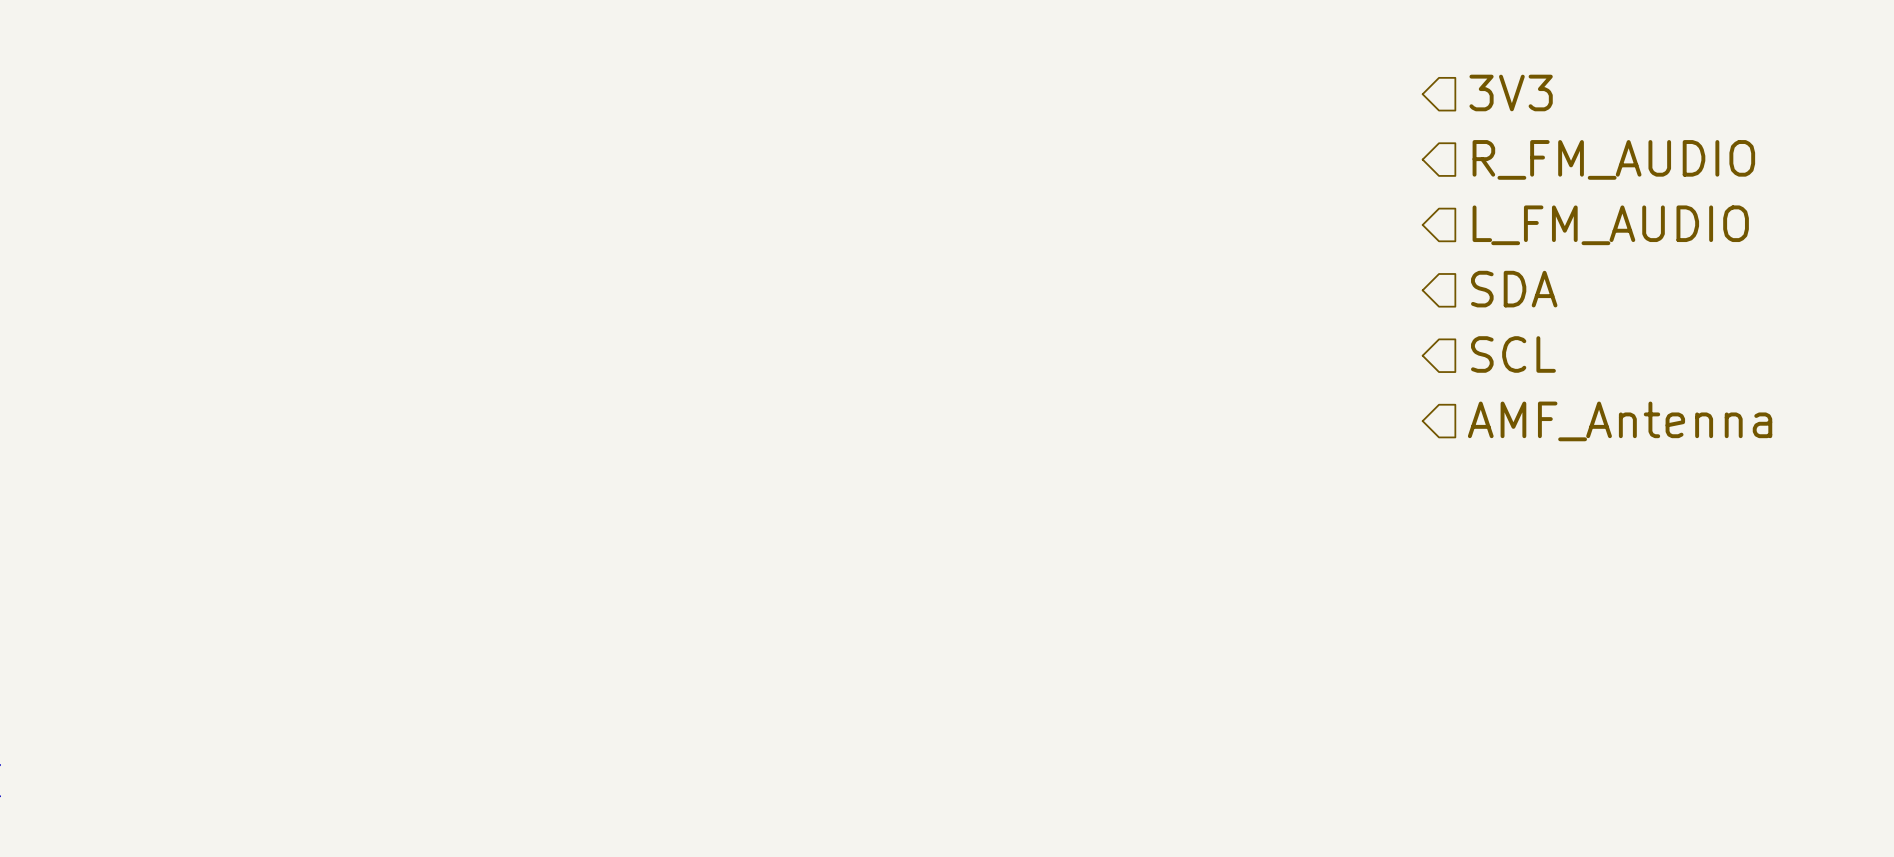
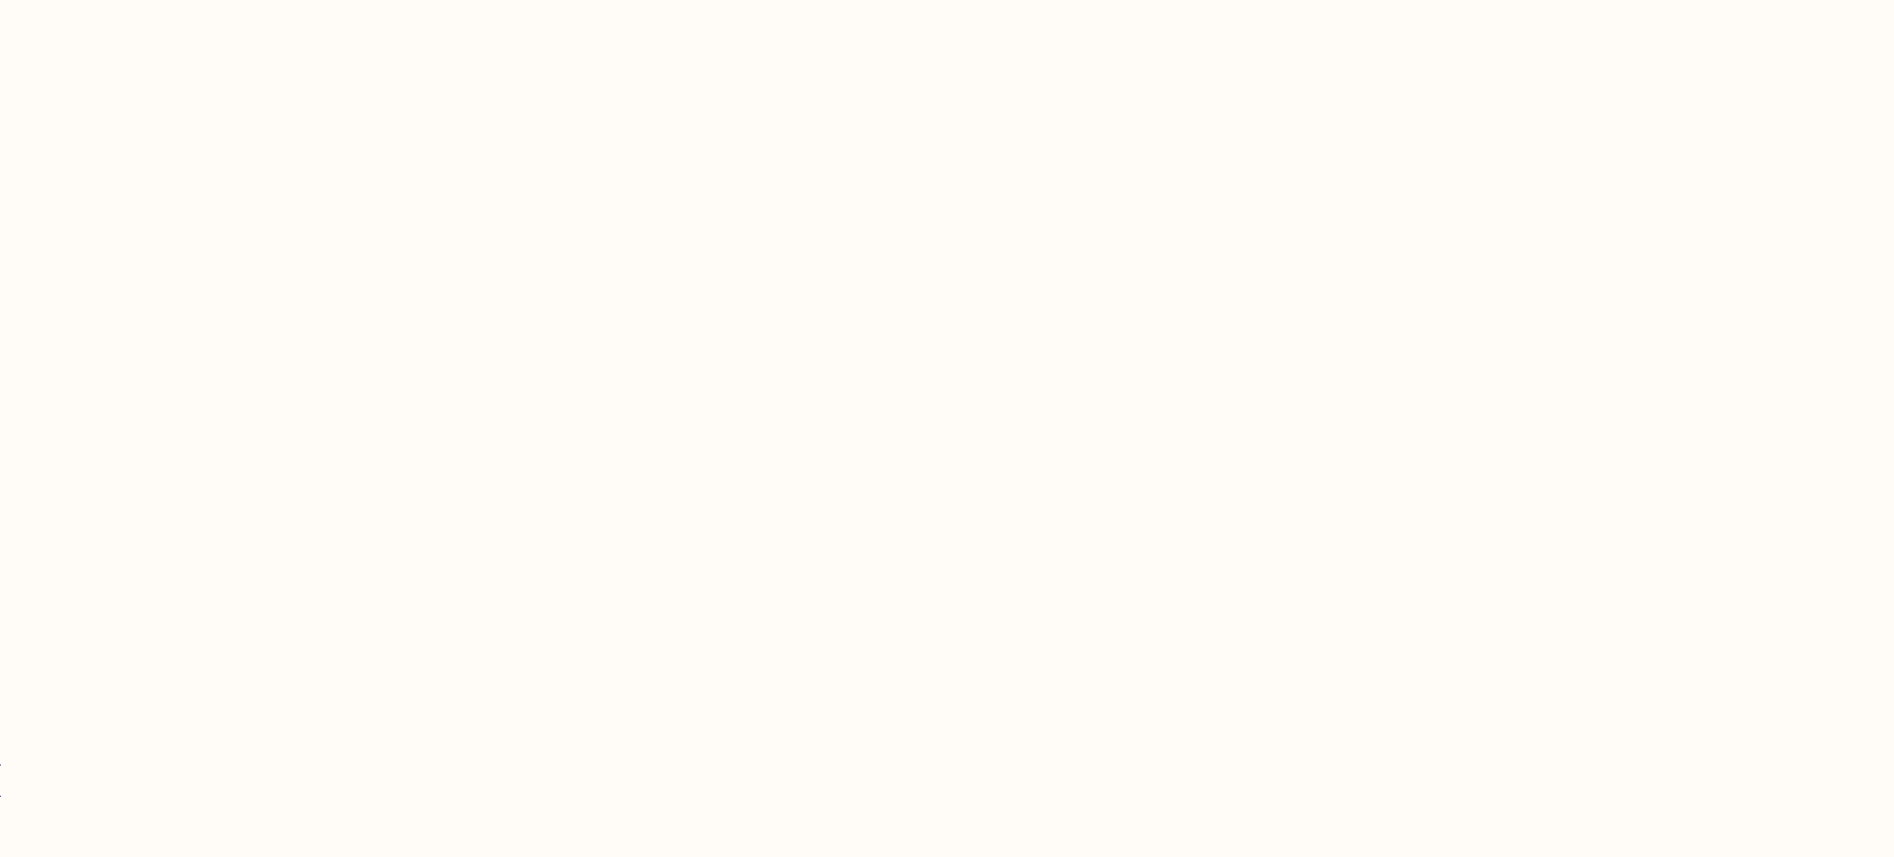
hierarchical label: 3V3 (1511, 92) -> none
hierarchical label: R_FM_AUDIO (1613, 159) -> none
hierarchical label: L_FM_AUDIO (1610, 225) -> none
hierarchical label: SDA (1514, 289) -> none
hierarchical label: SCL (1513, 354) -> none
hierarchical label: AMF_Antenna (1620, 421) -> none

